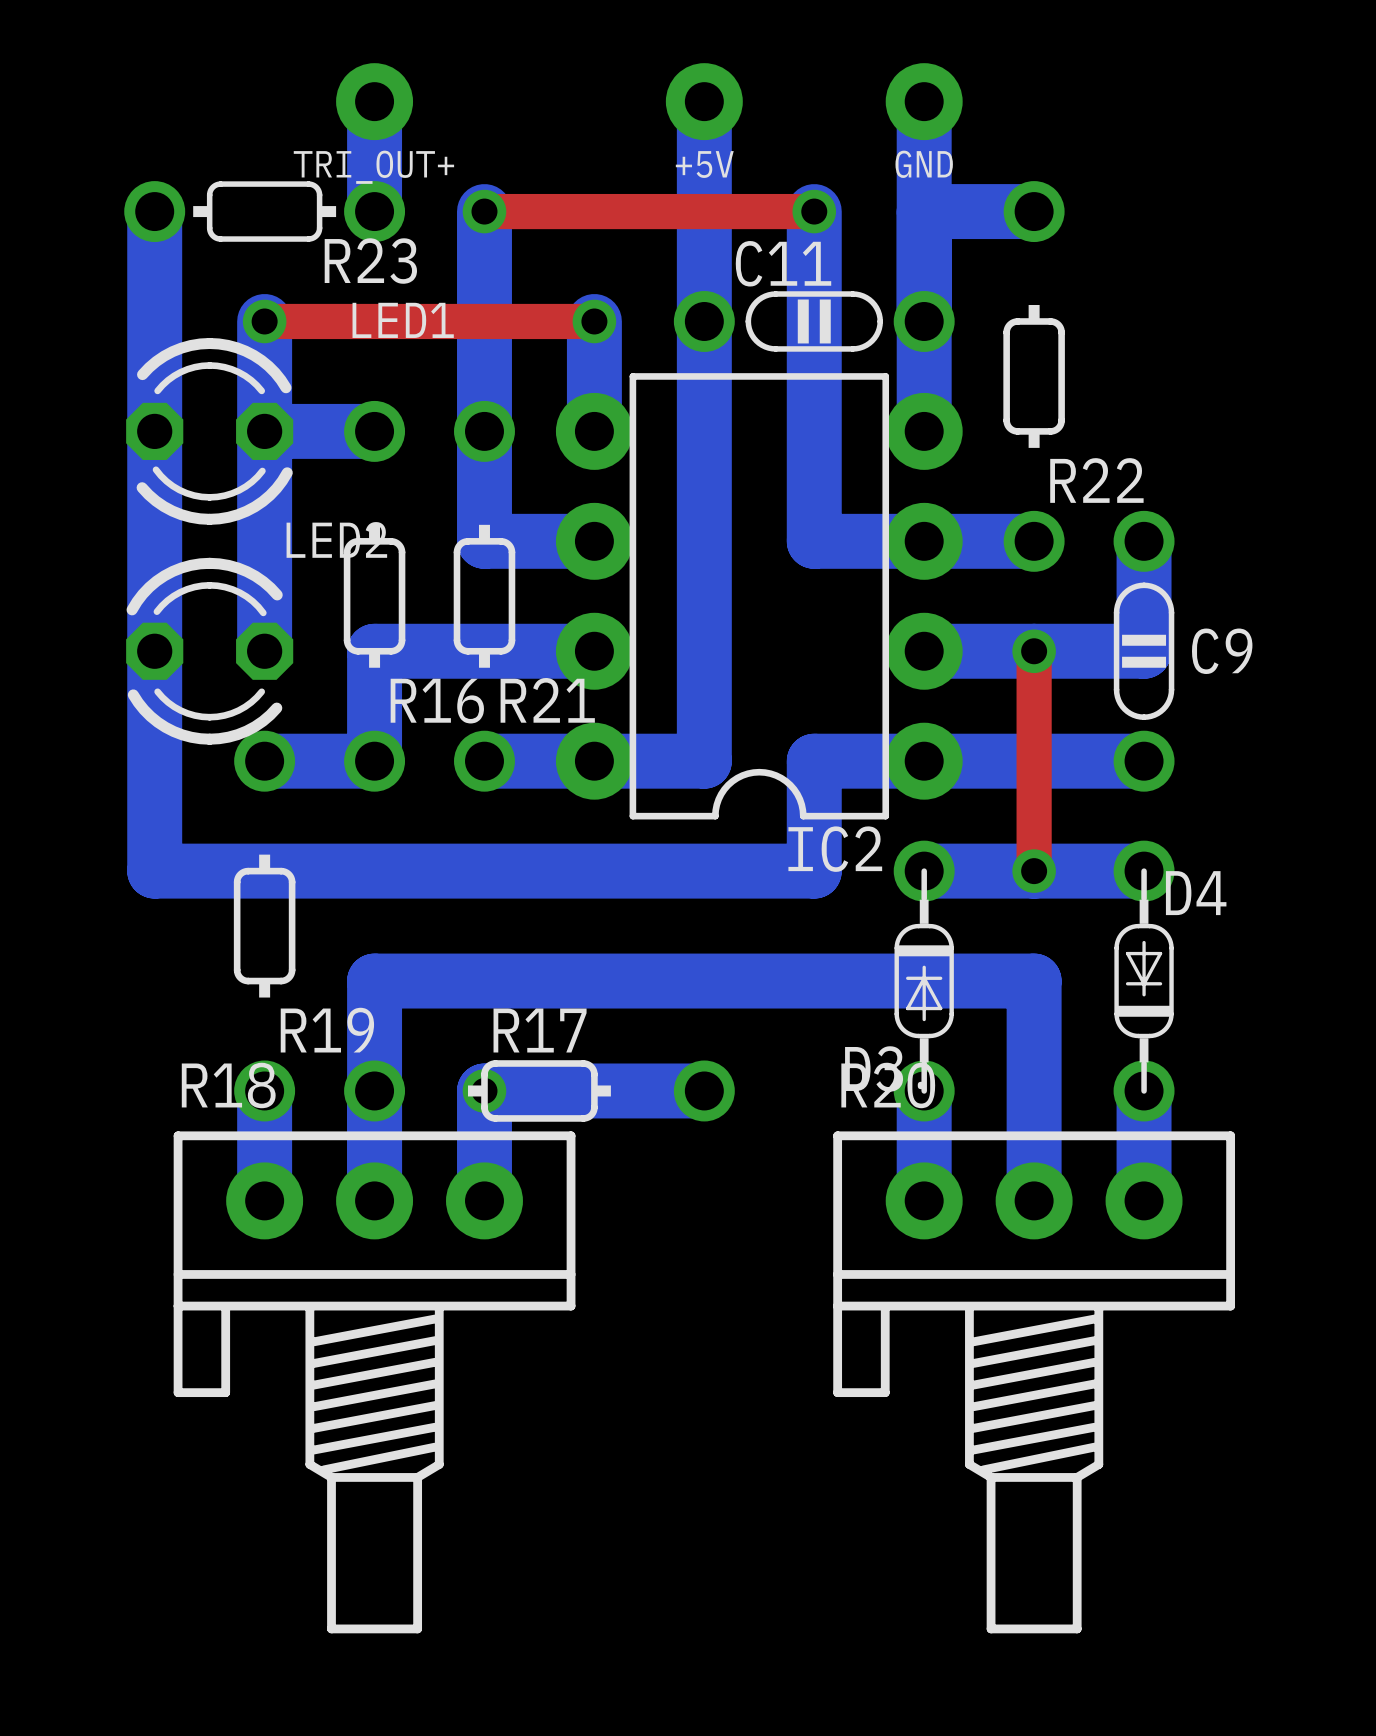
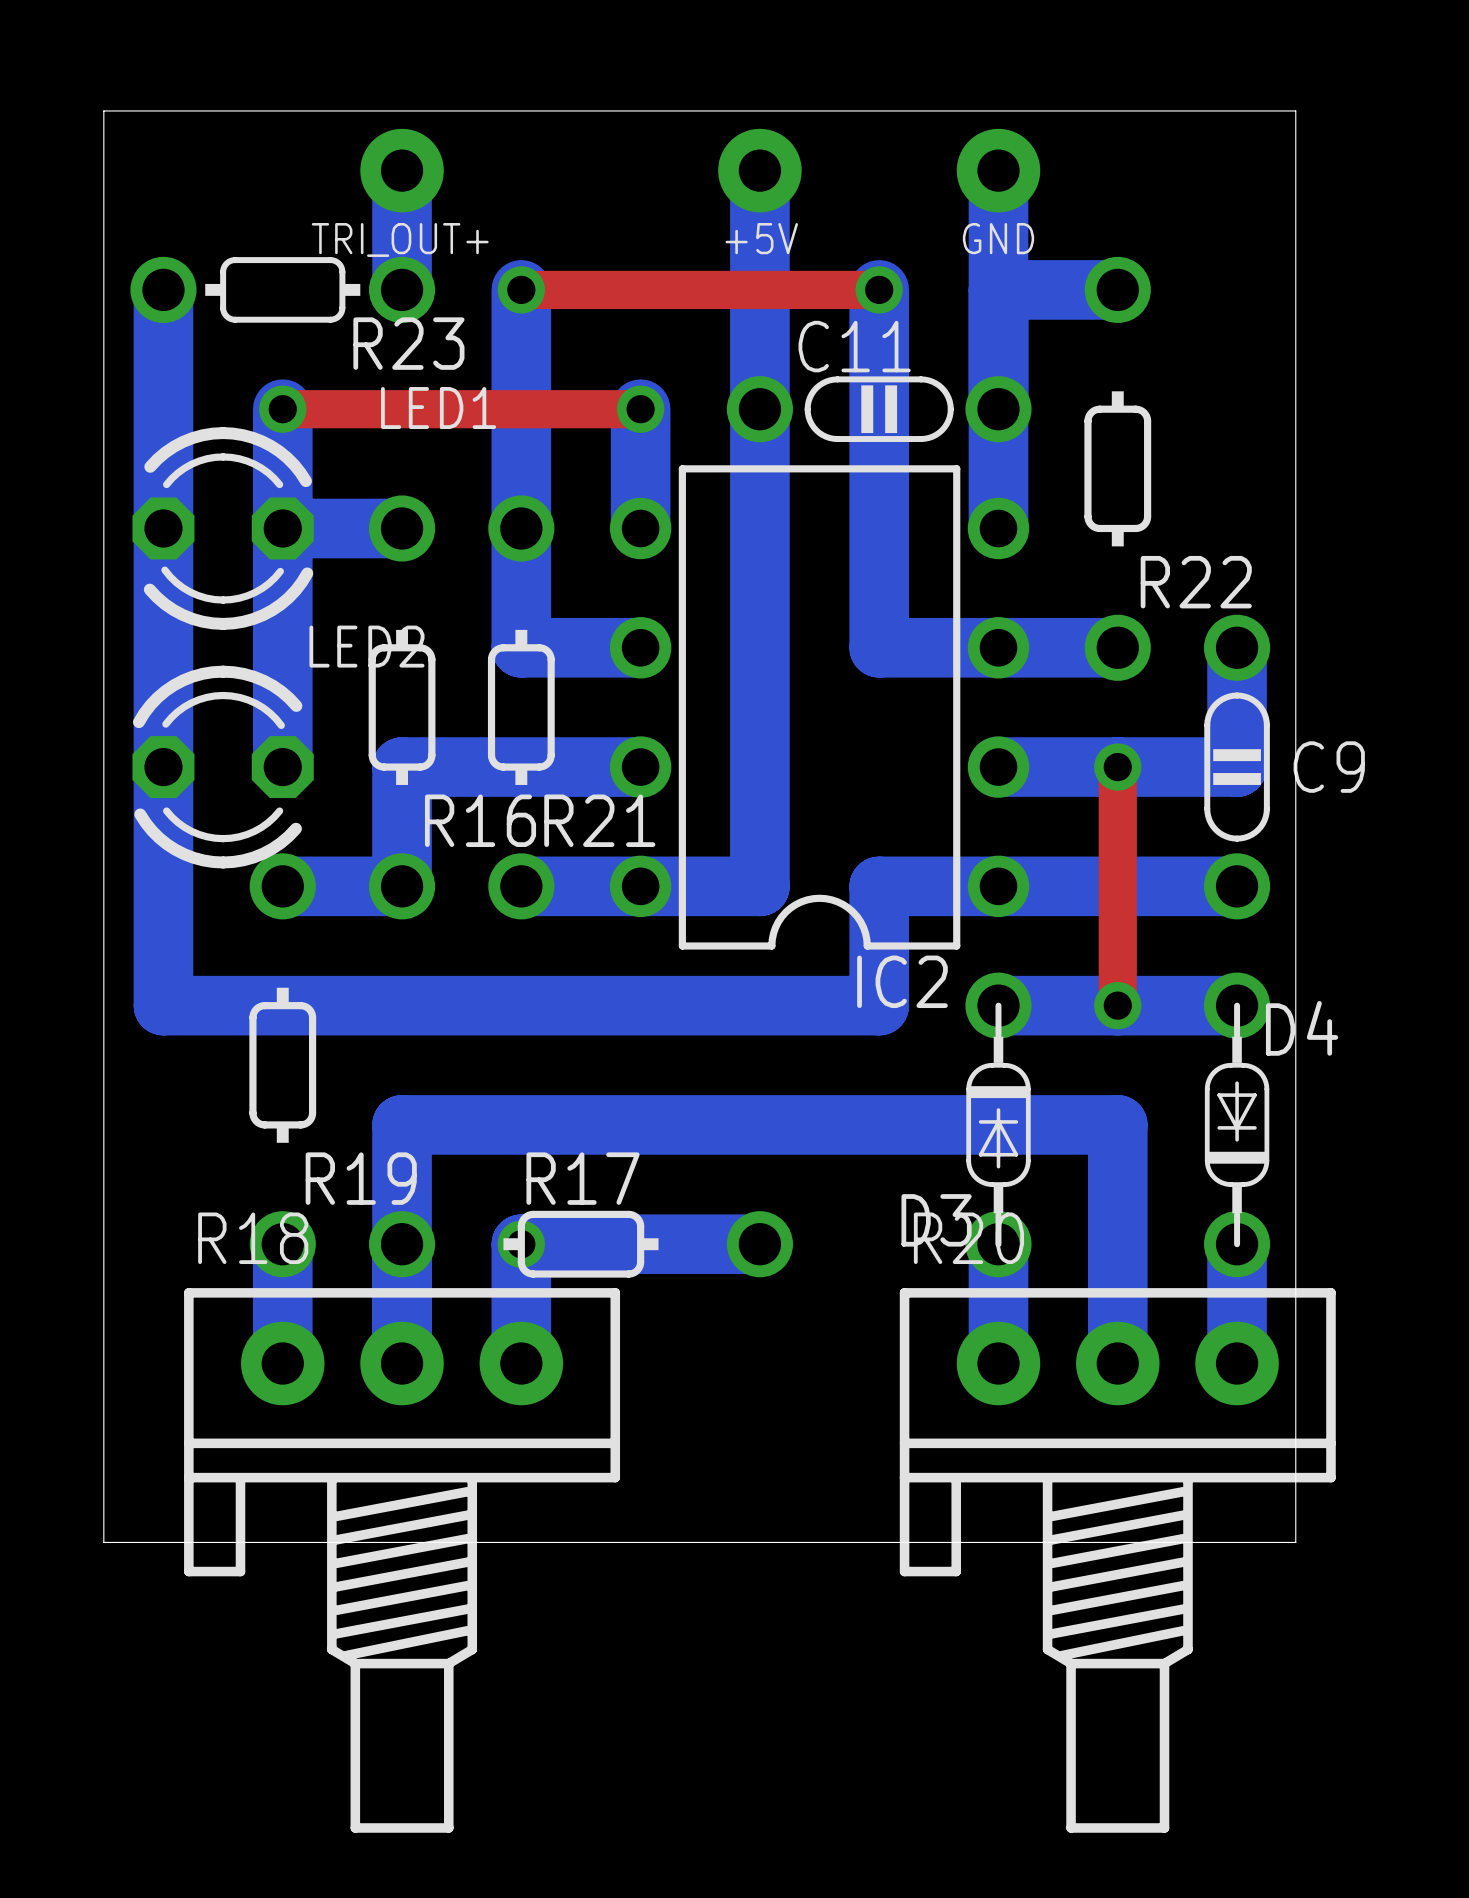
board edge: none -> (103, 110) (1295, 110) (1295, 1542) (103, 1542) (103, 110)
IC2 footprint: [555, 373, 963, 820] -> [609, 465, 1030, 950]

